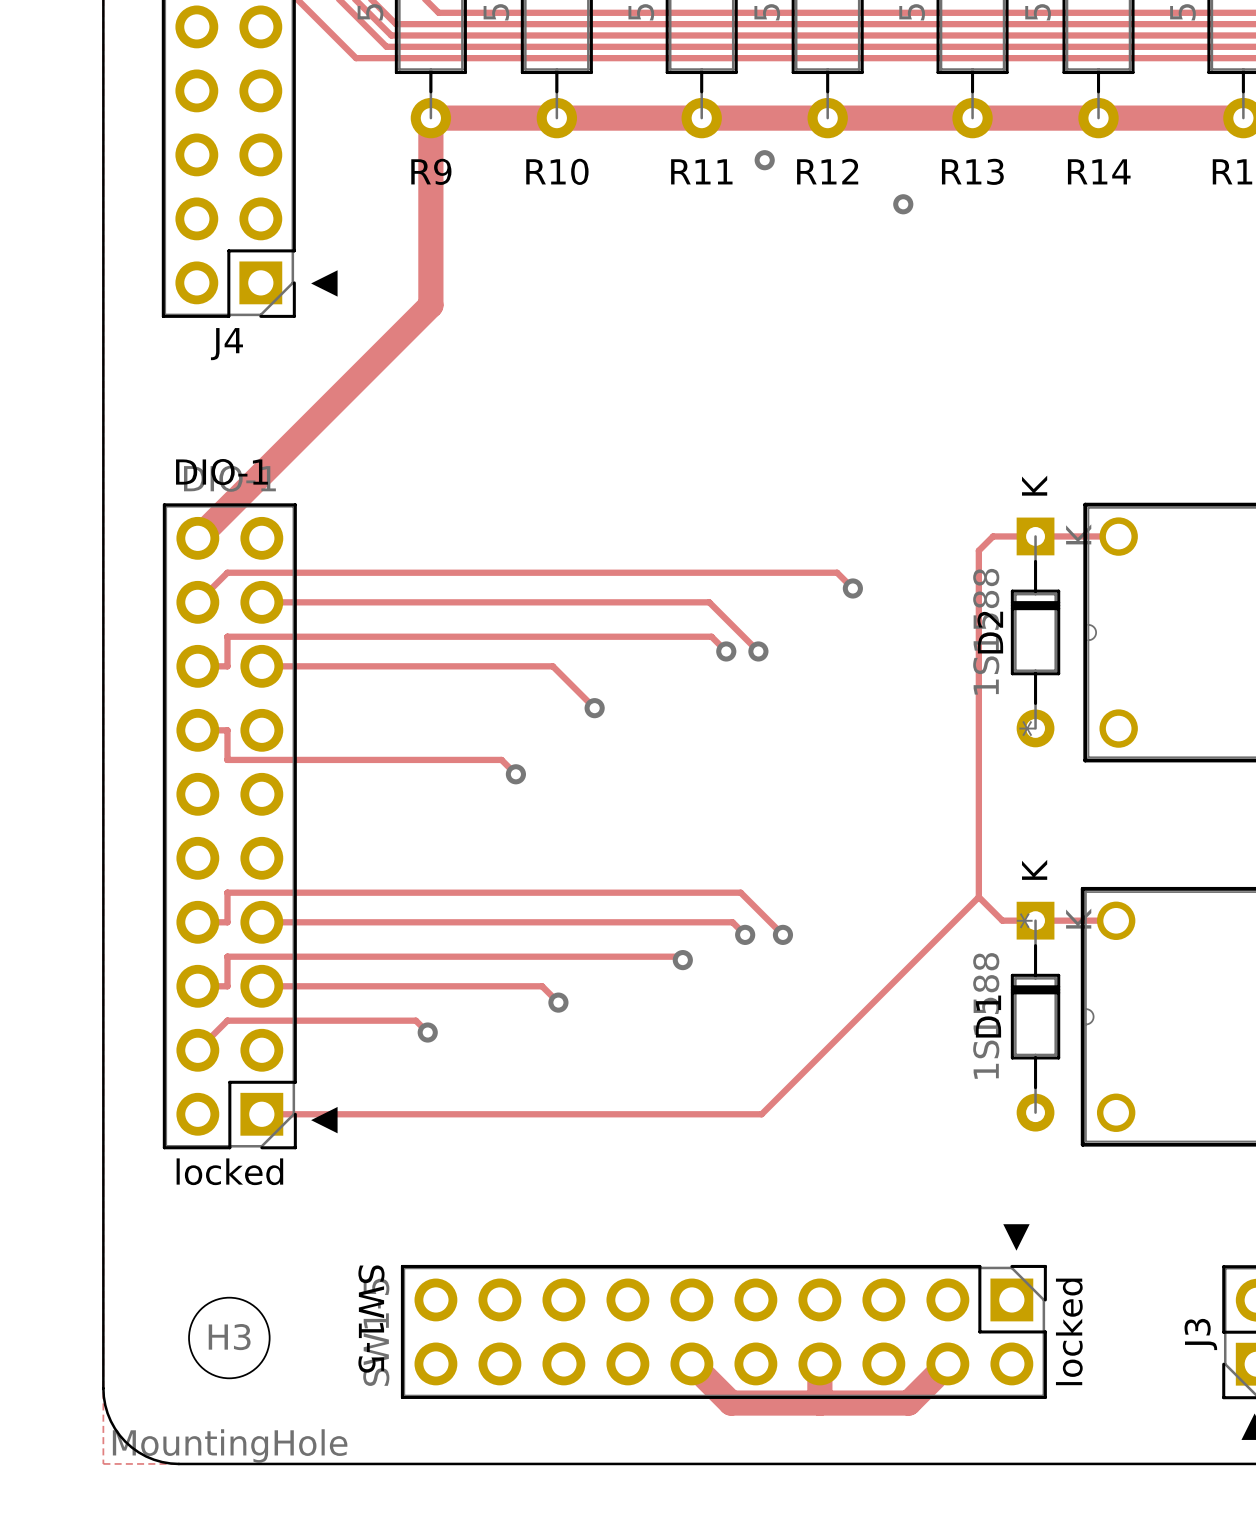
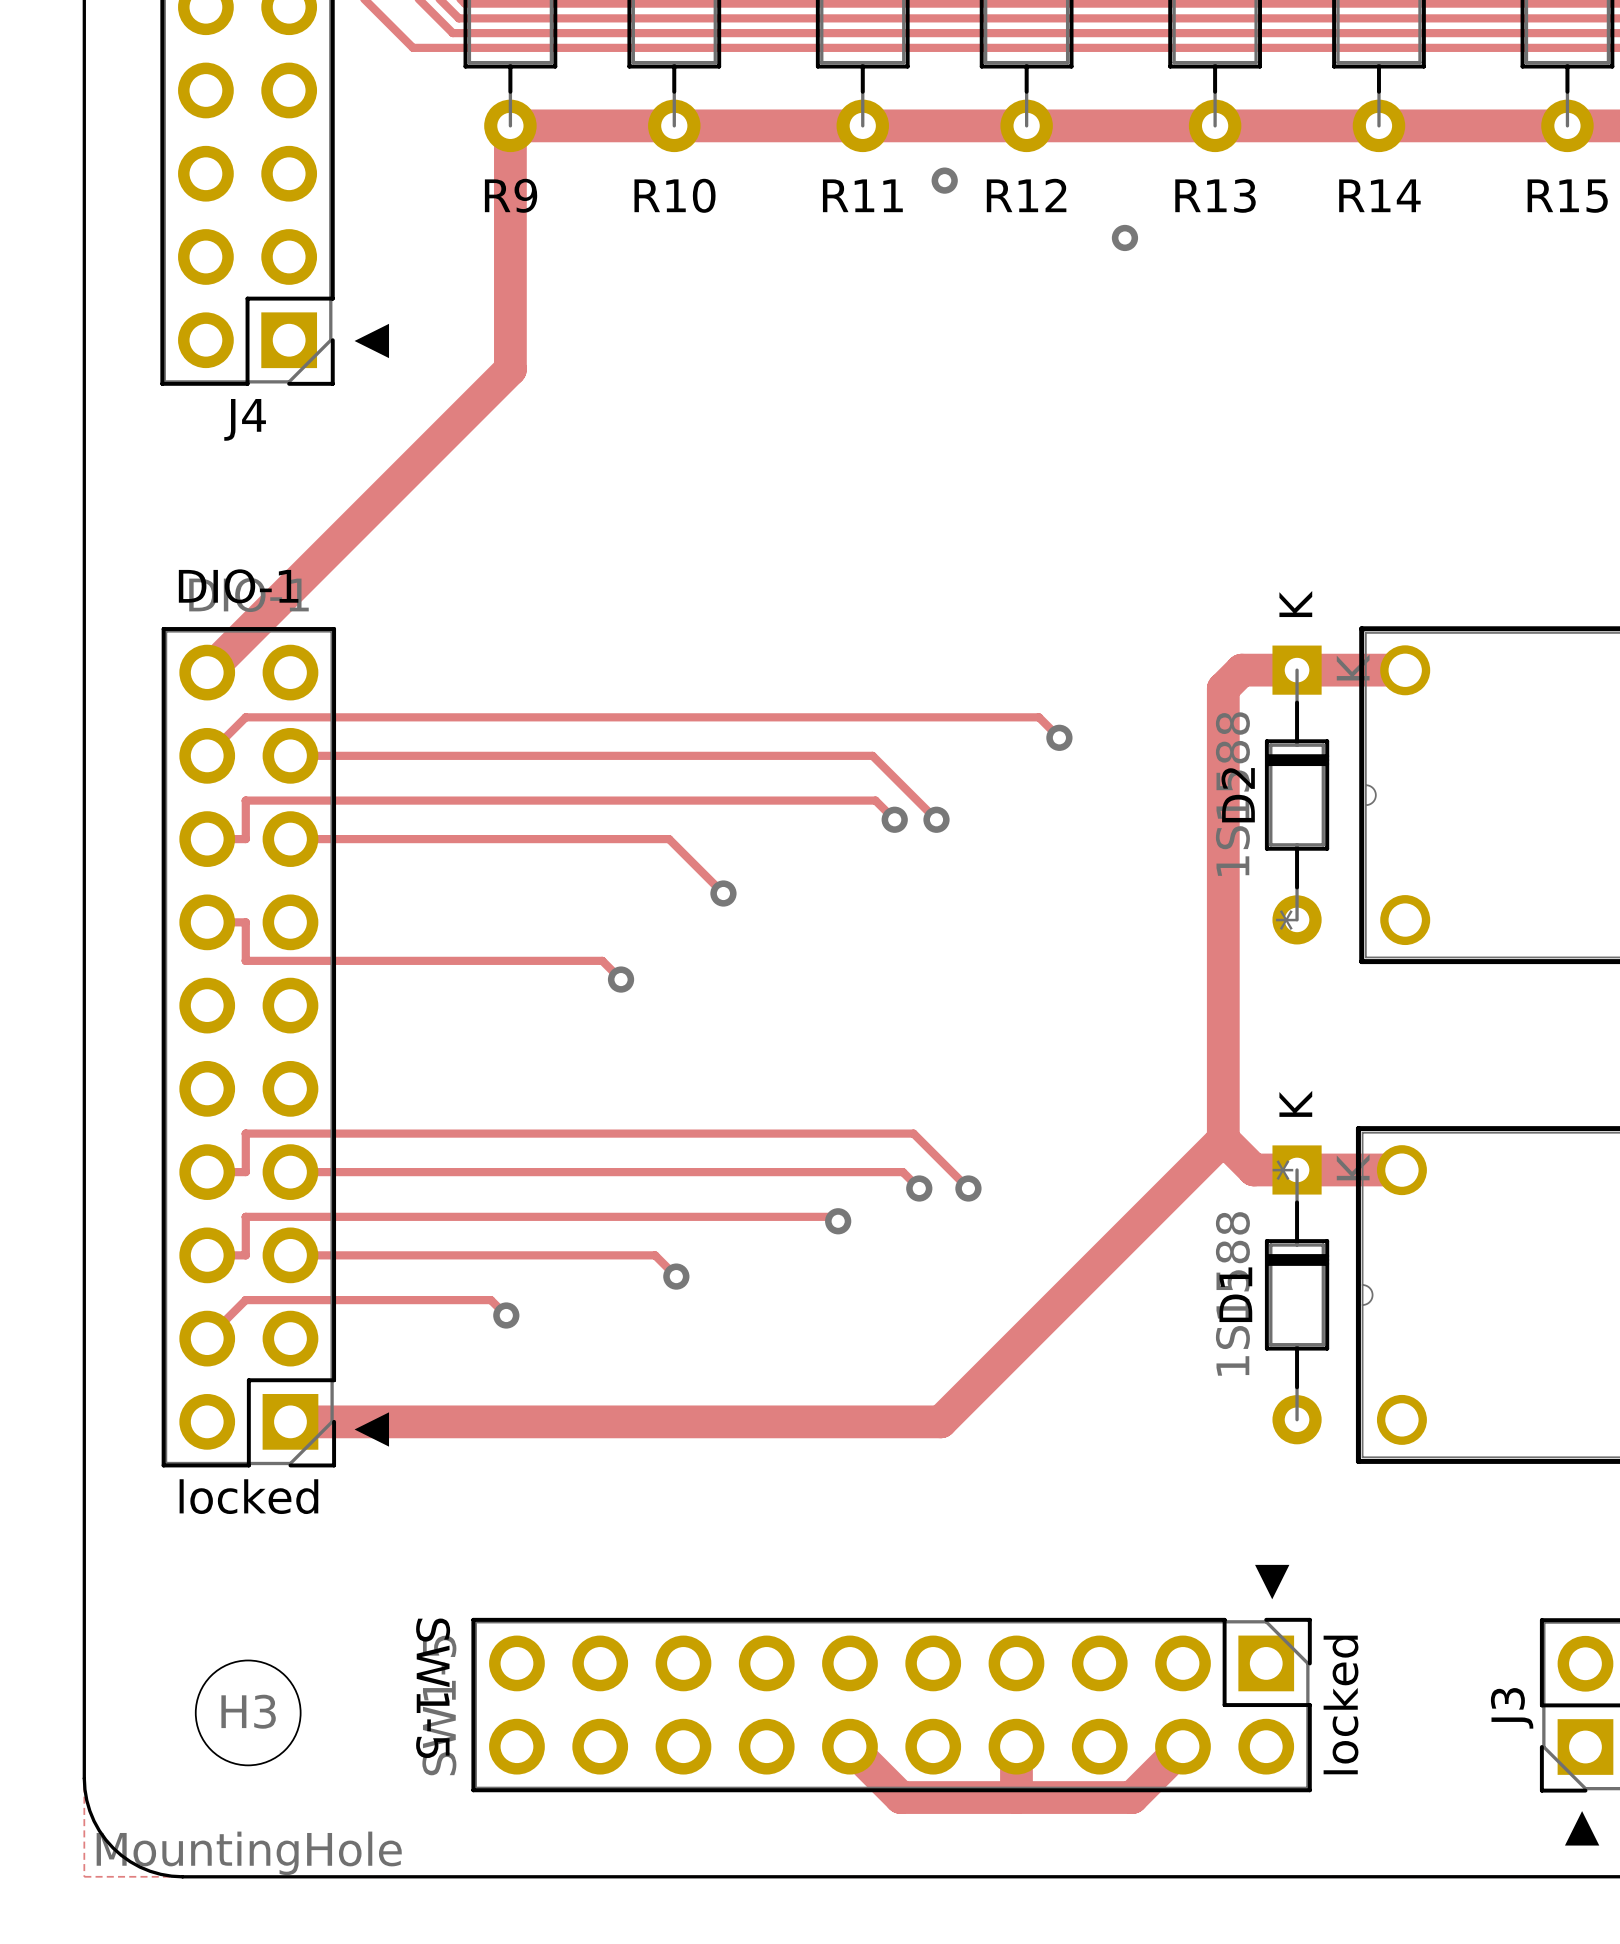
track width: thin (1118, 536) (993, 536) (978, 550) (978, 897) -> thick (1405, 670) (1241, 670) (1223, 688) (1223, 1139)
track width: thin (978, 897) (761, 1114) (261, 1114) -> thick (1223, 1139) (940, 1421) (290, 1421)
track width: thin (978, 897) (1002, 920) (1116, 920) -> thick (1223, 1139) (1253, 1169) (1401, 1169)

